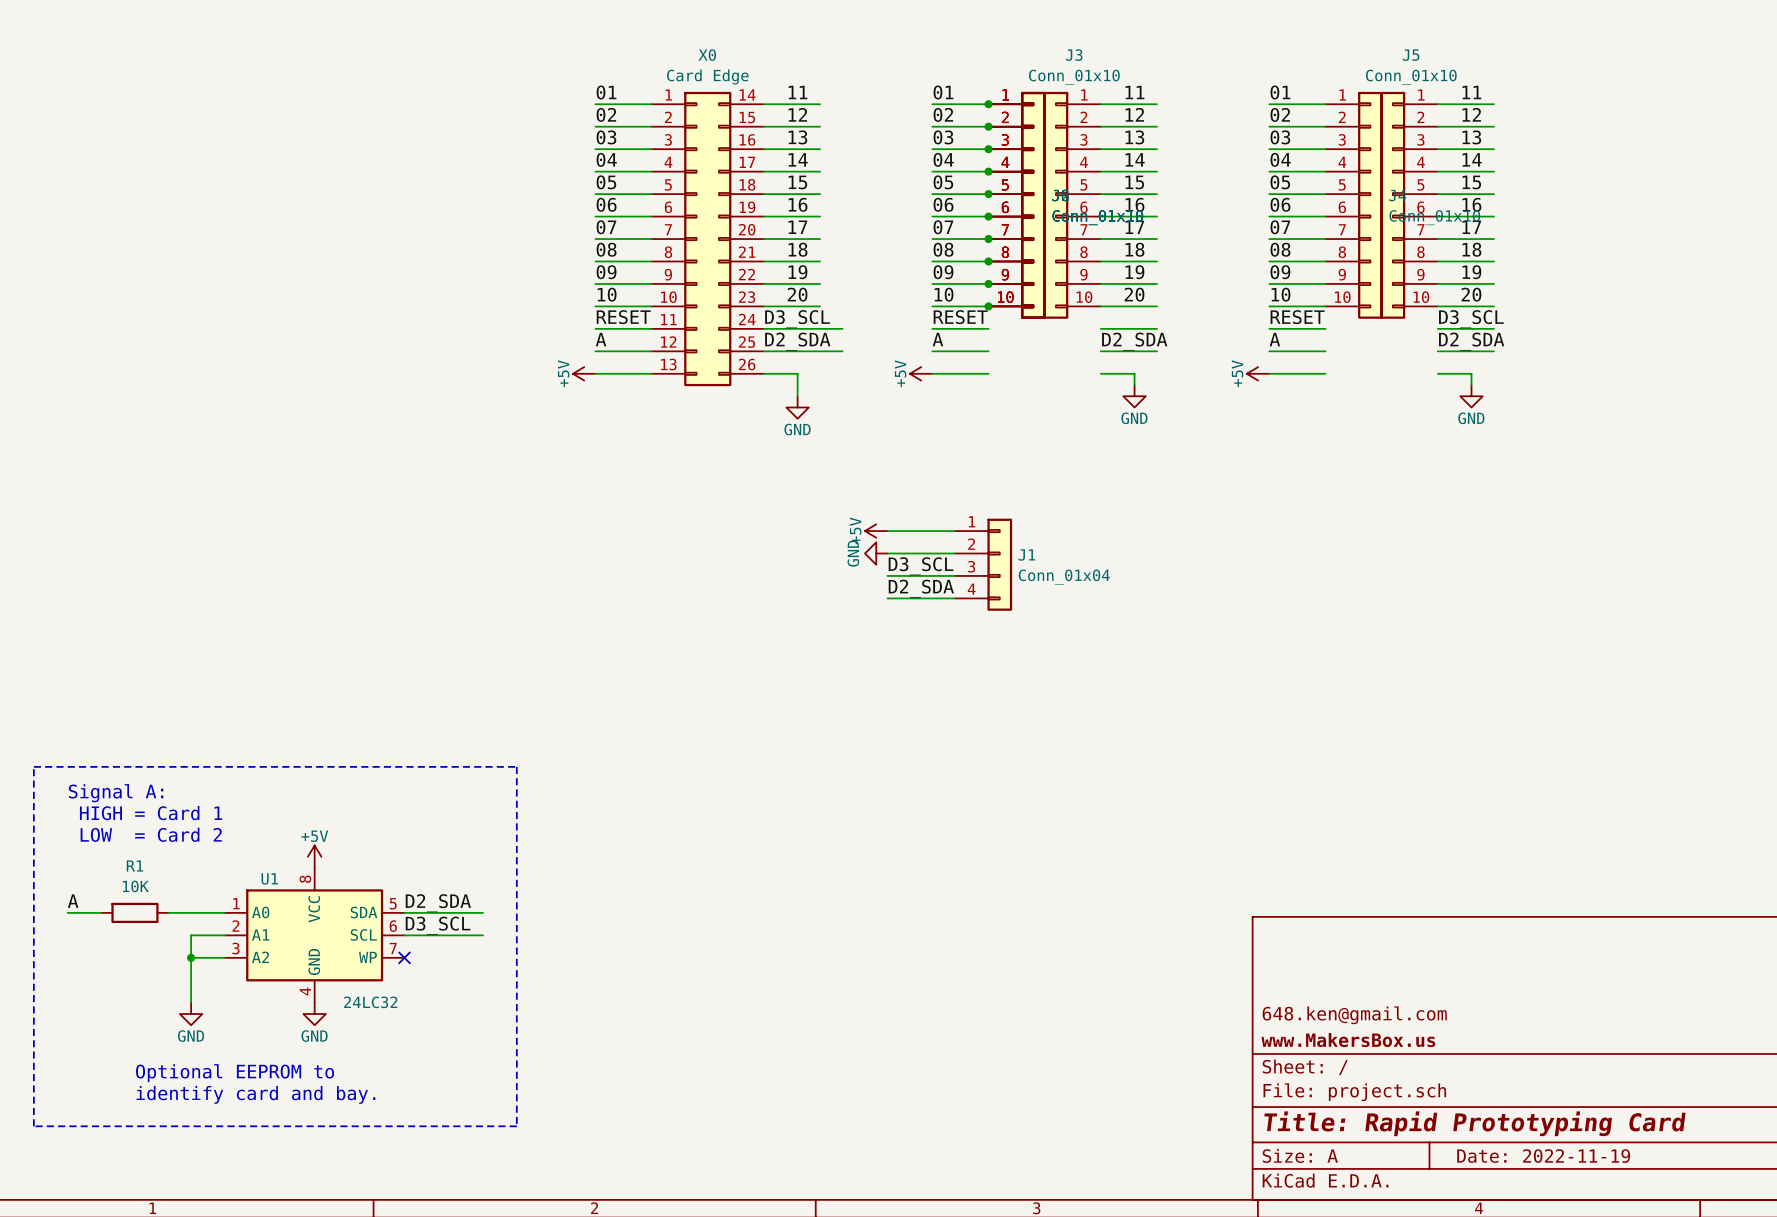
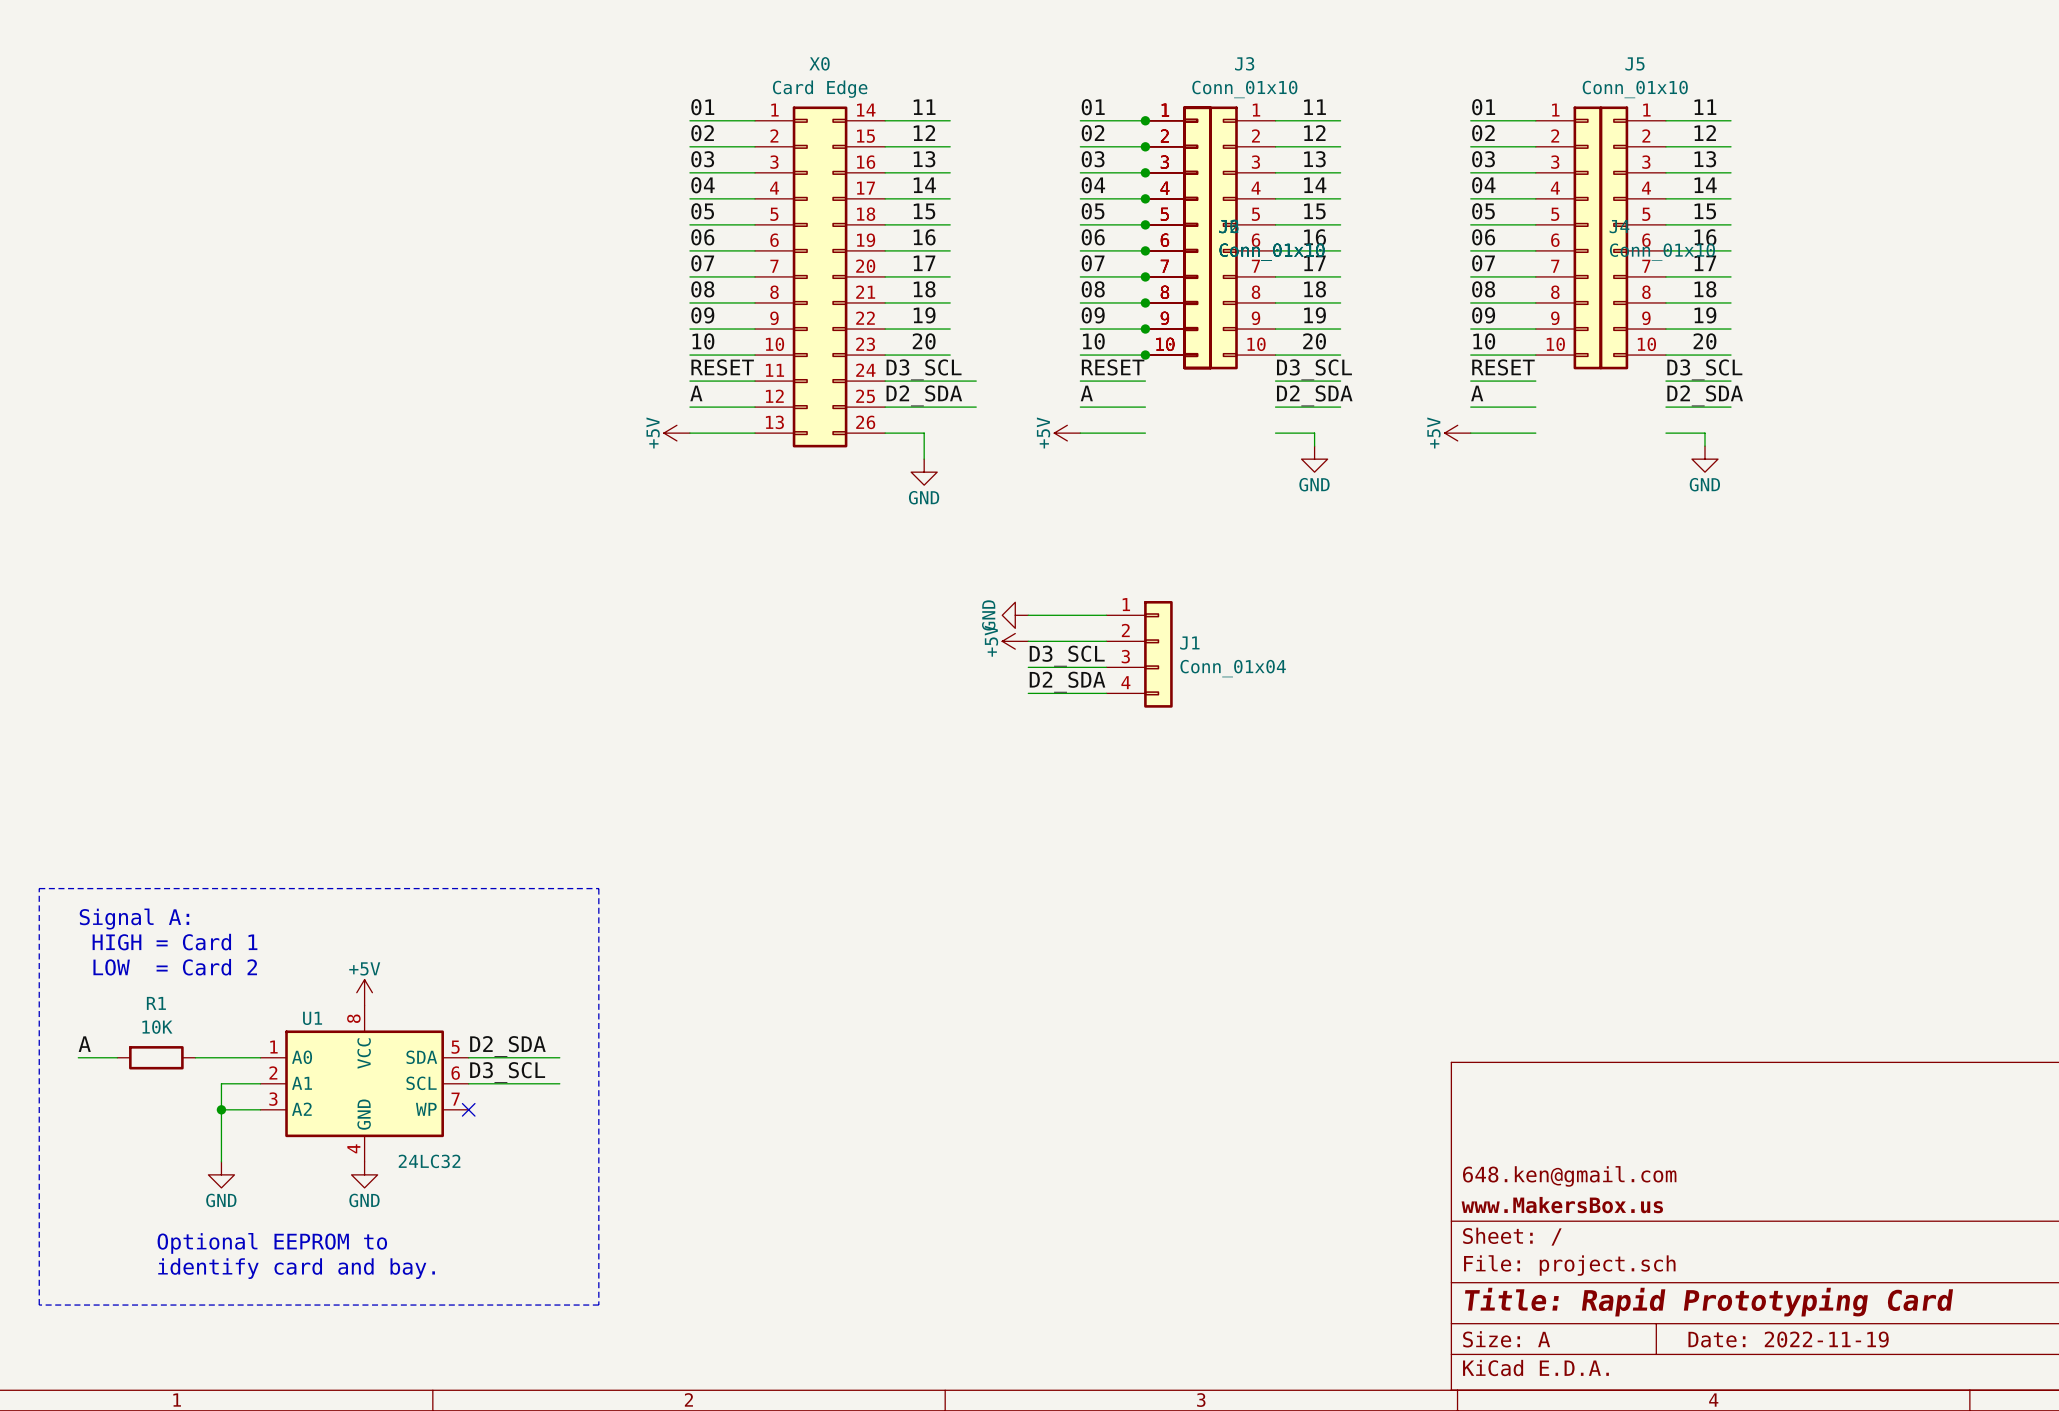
label: none -> D3_SCL (1314, 369)
power symbol: +5V (876, 531) -> GND (1015, 615)
power symbol: GND (876, 553) -> +5V (1015, 641)

